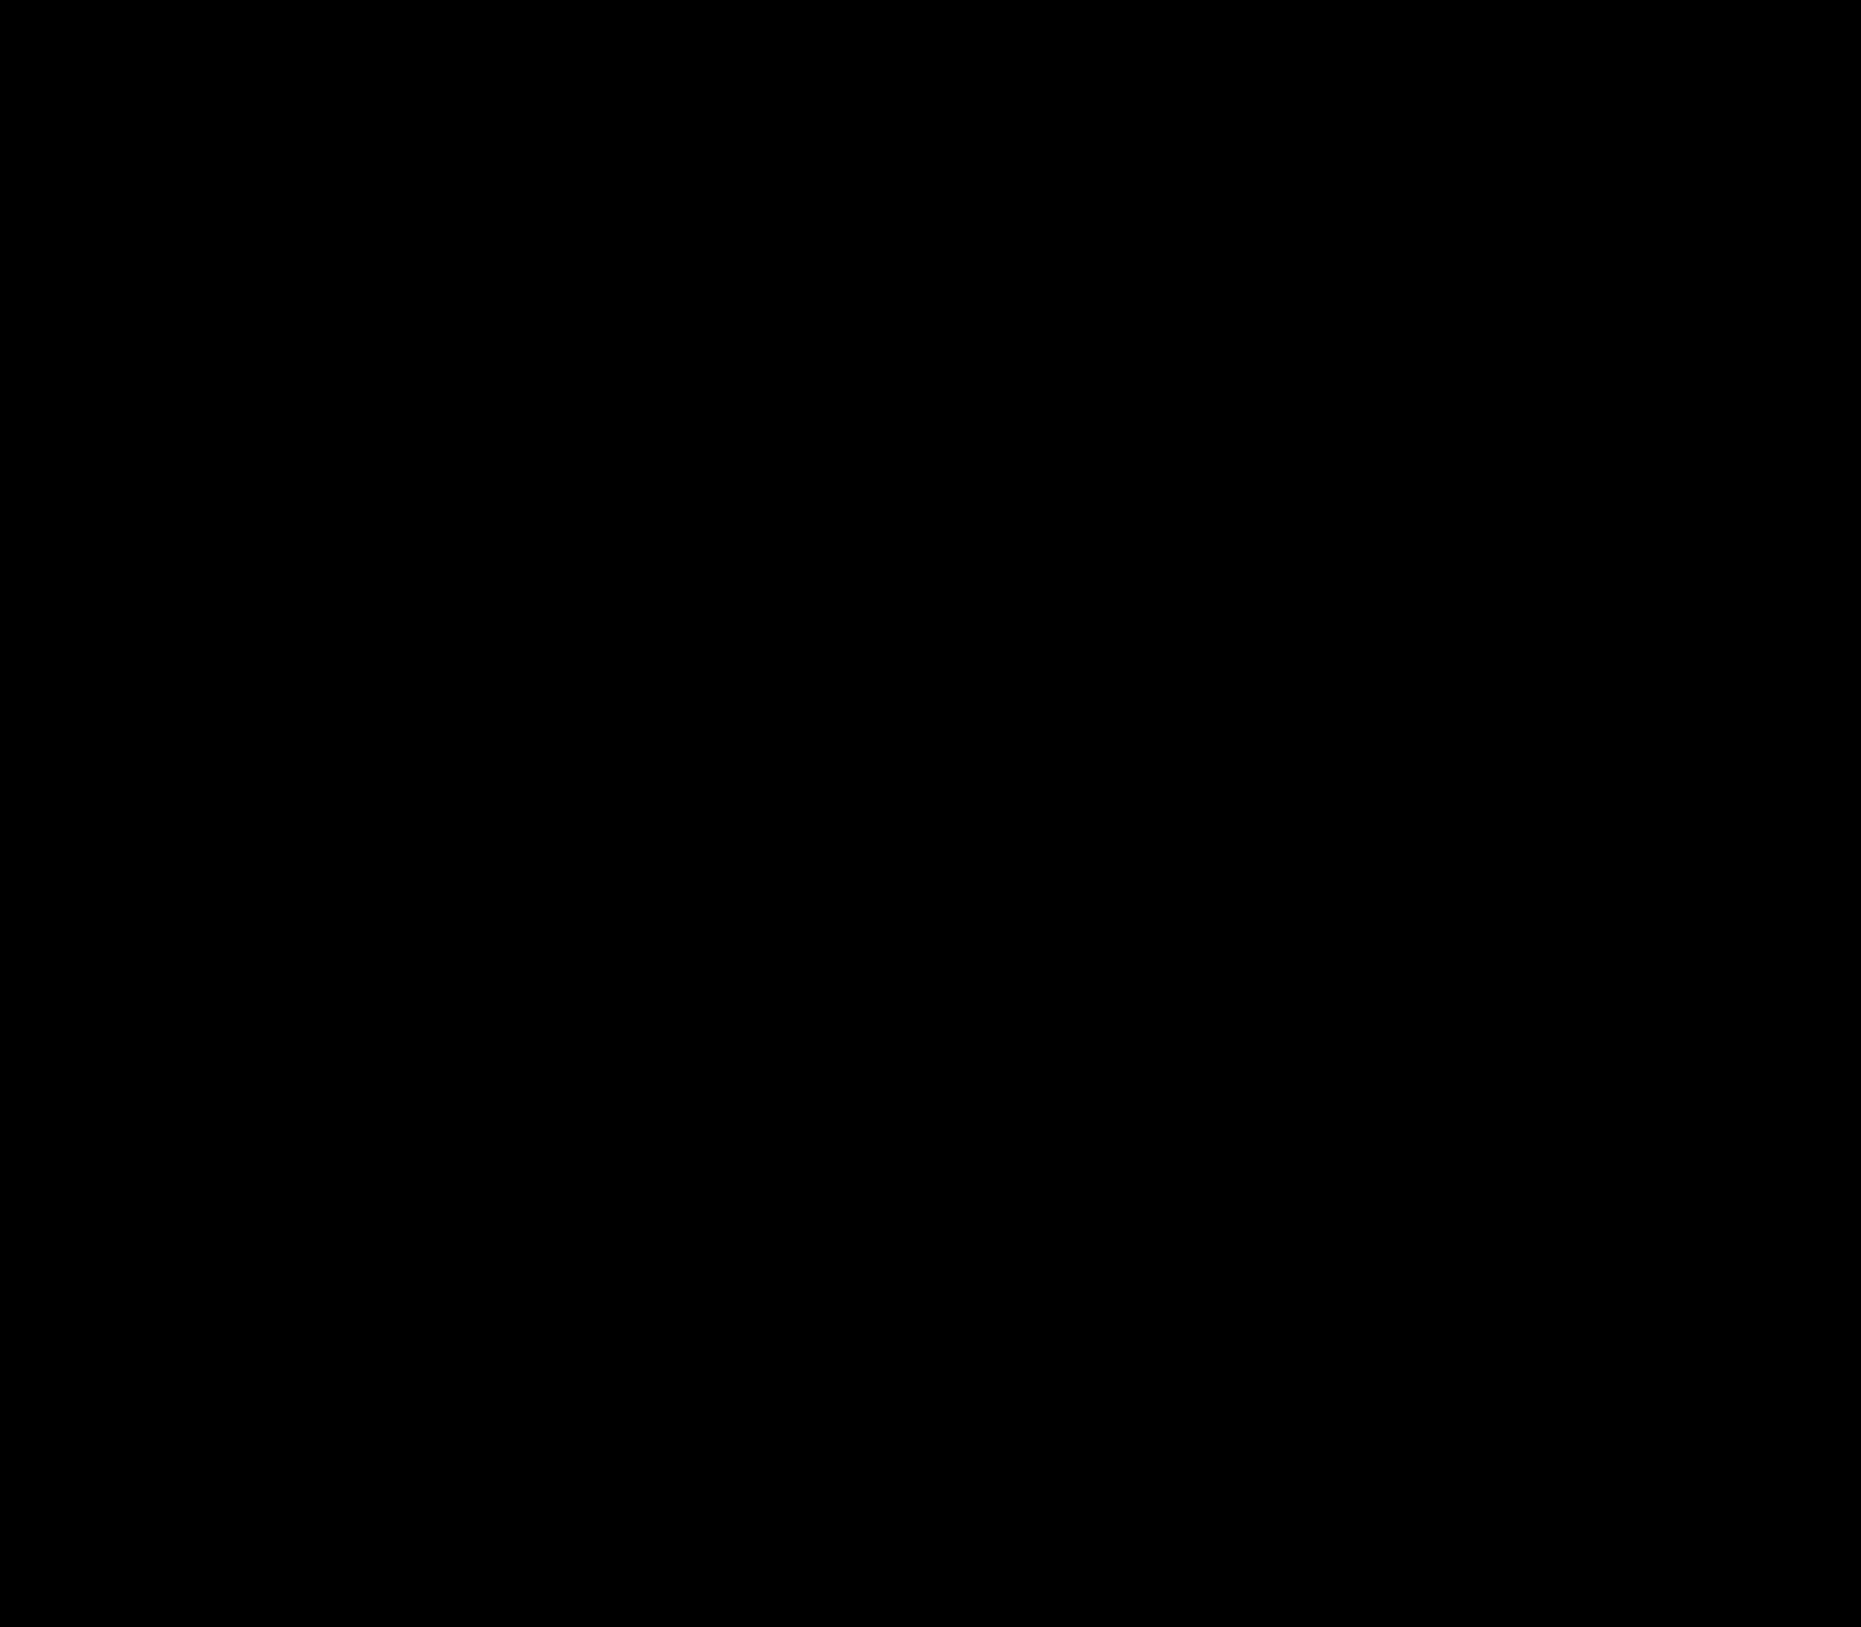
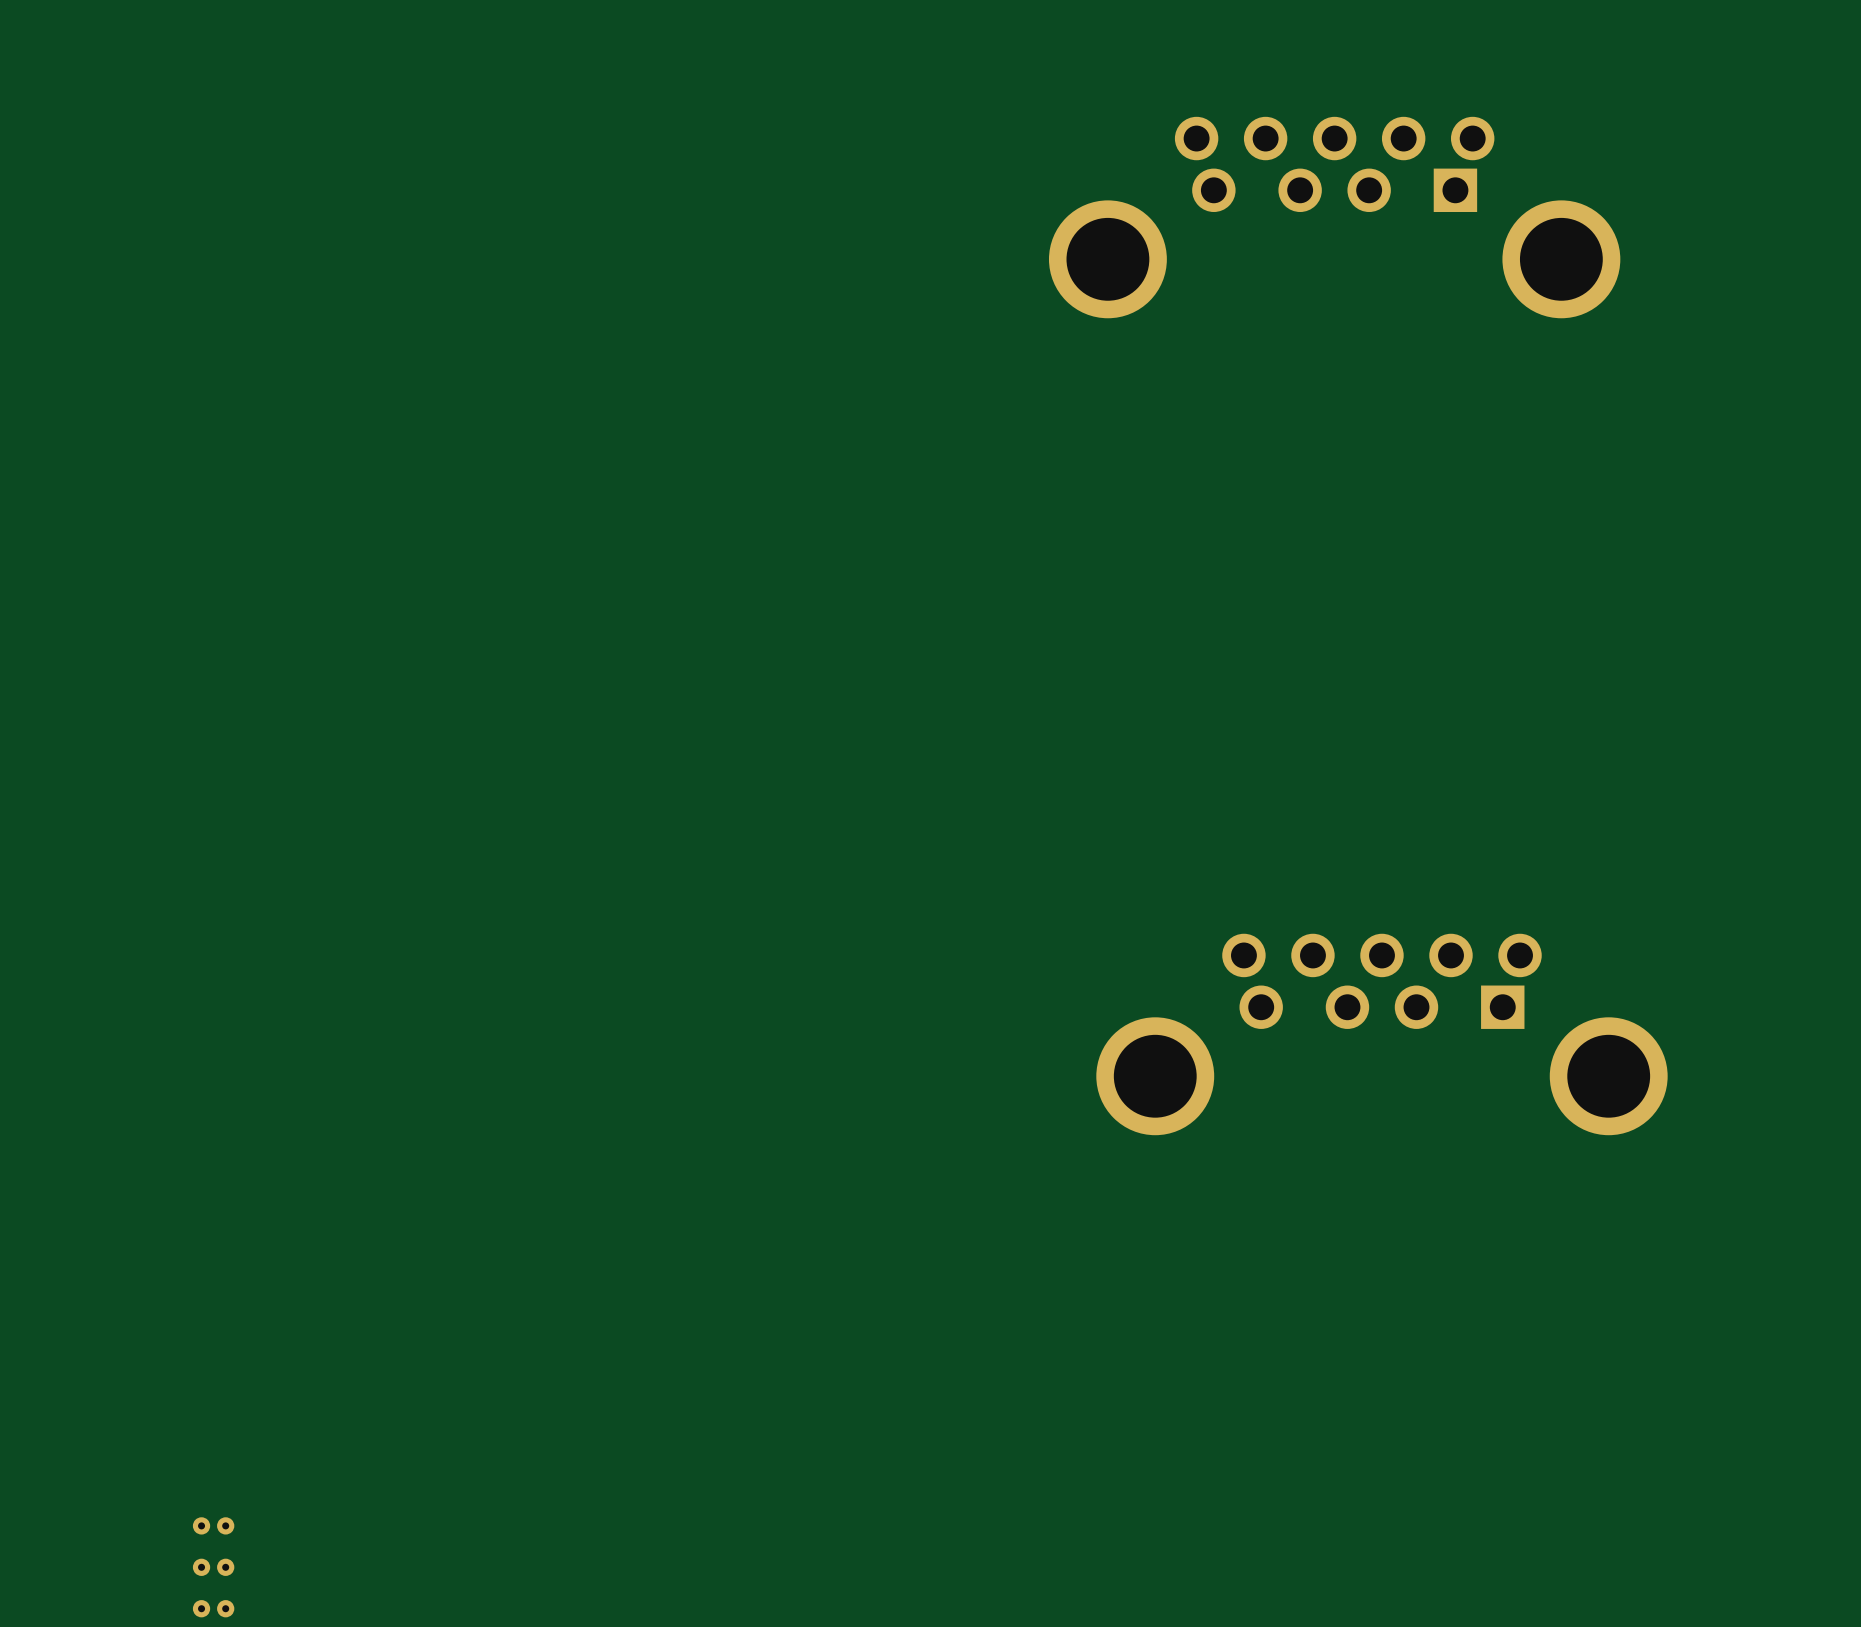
part: none -> (1334, 217)
part: none -> (1381, 1034)
part: none -> (213, 1567)

